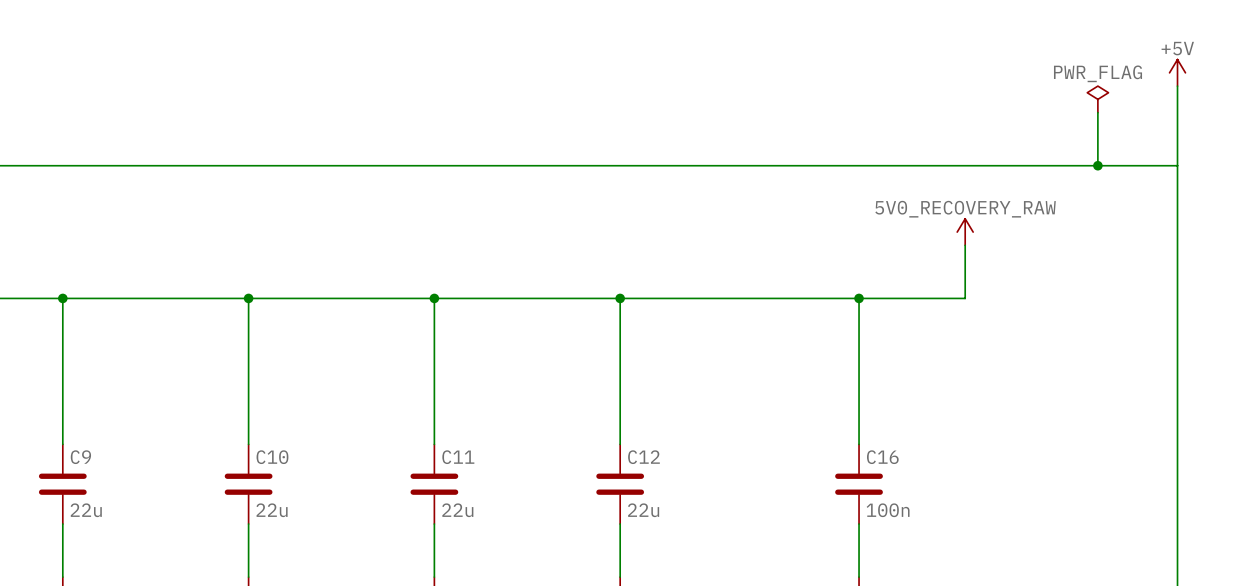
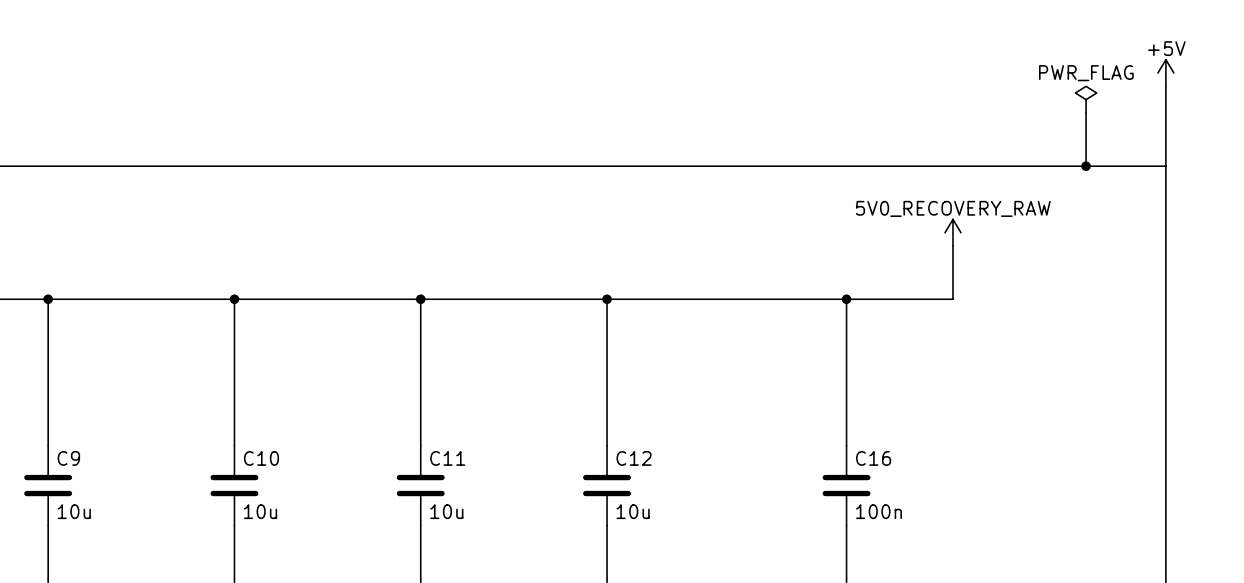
C9 value: 22u (86, 510) -> 10u (74, 511)
C10 value: 22u (272, 510) -> 10u (260, 511)
C11 value: 22u (457, 510) -> 10u (446, 511)
C12 value: 22u (643, 510) -> 10u (633, 511)

